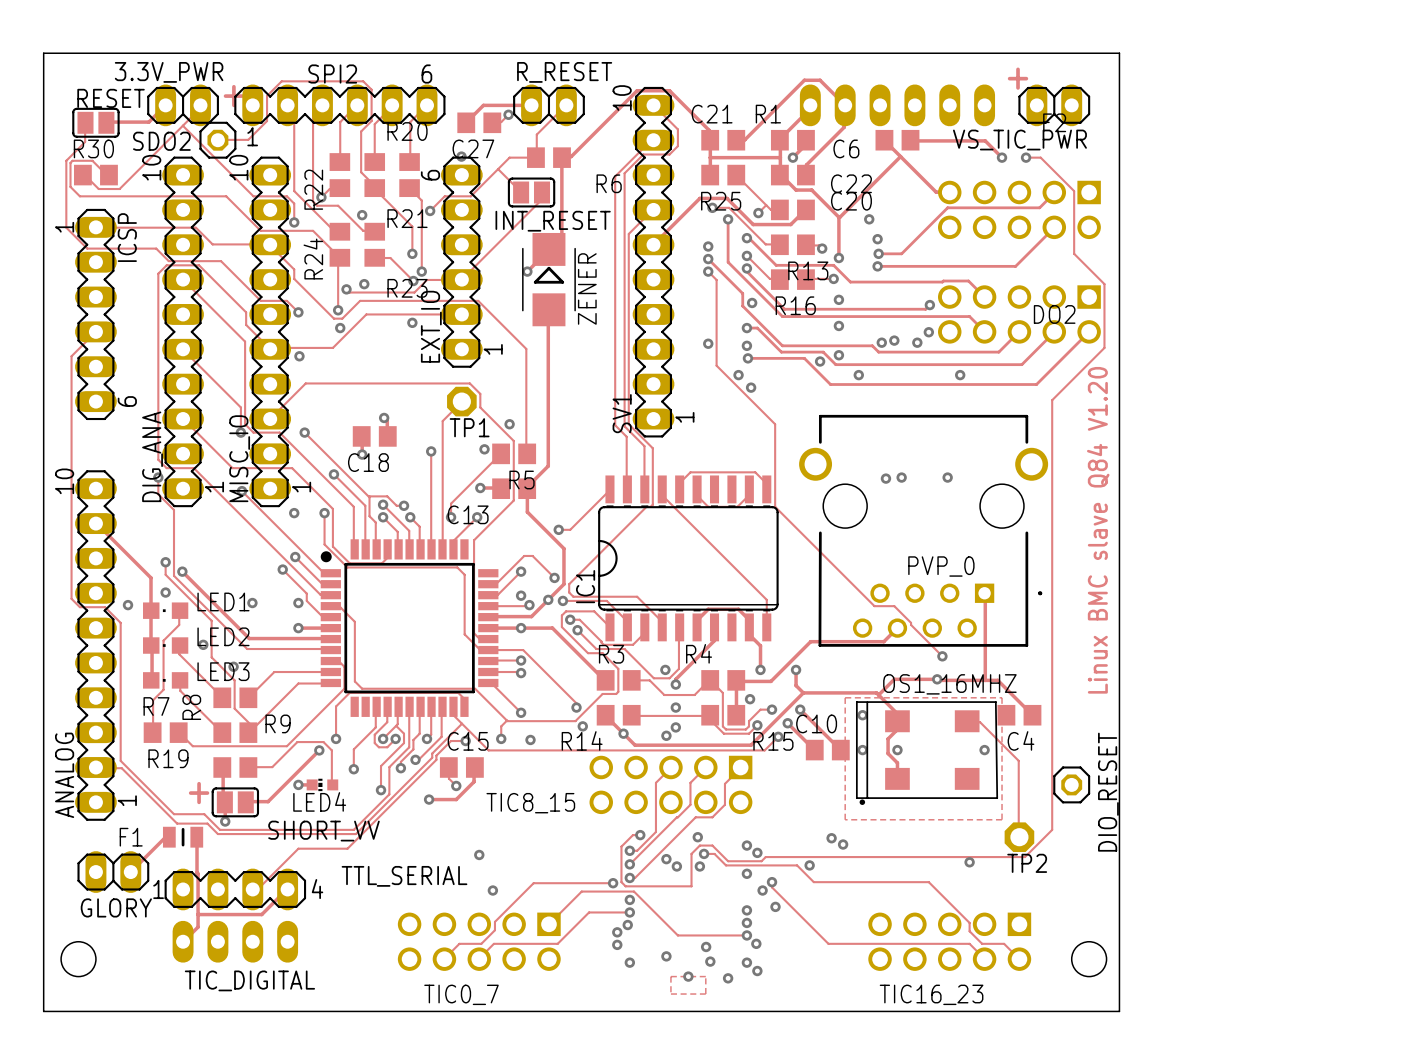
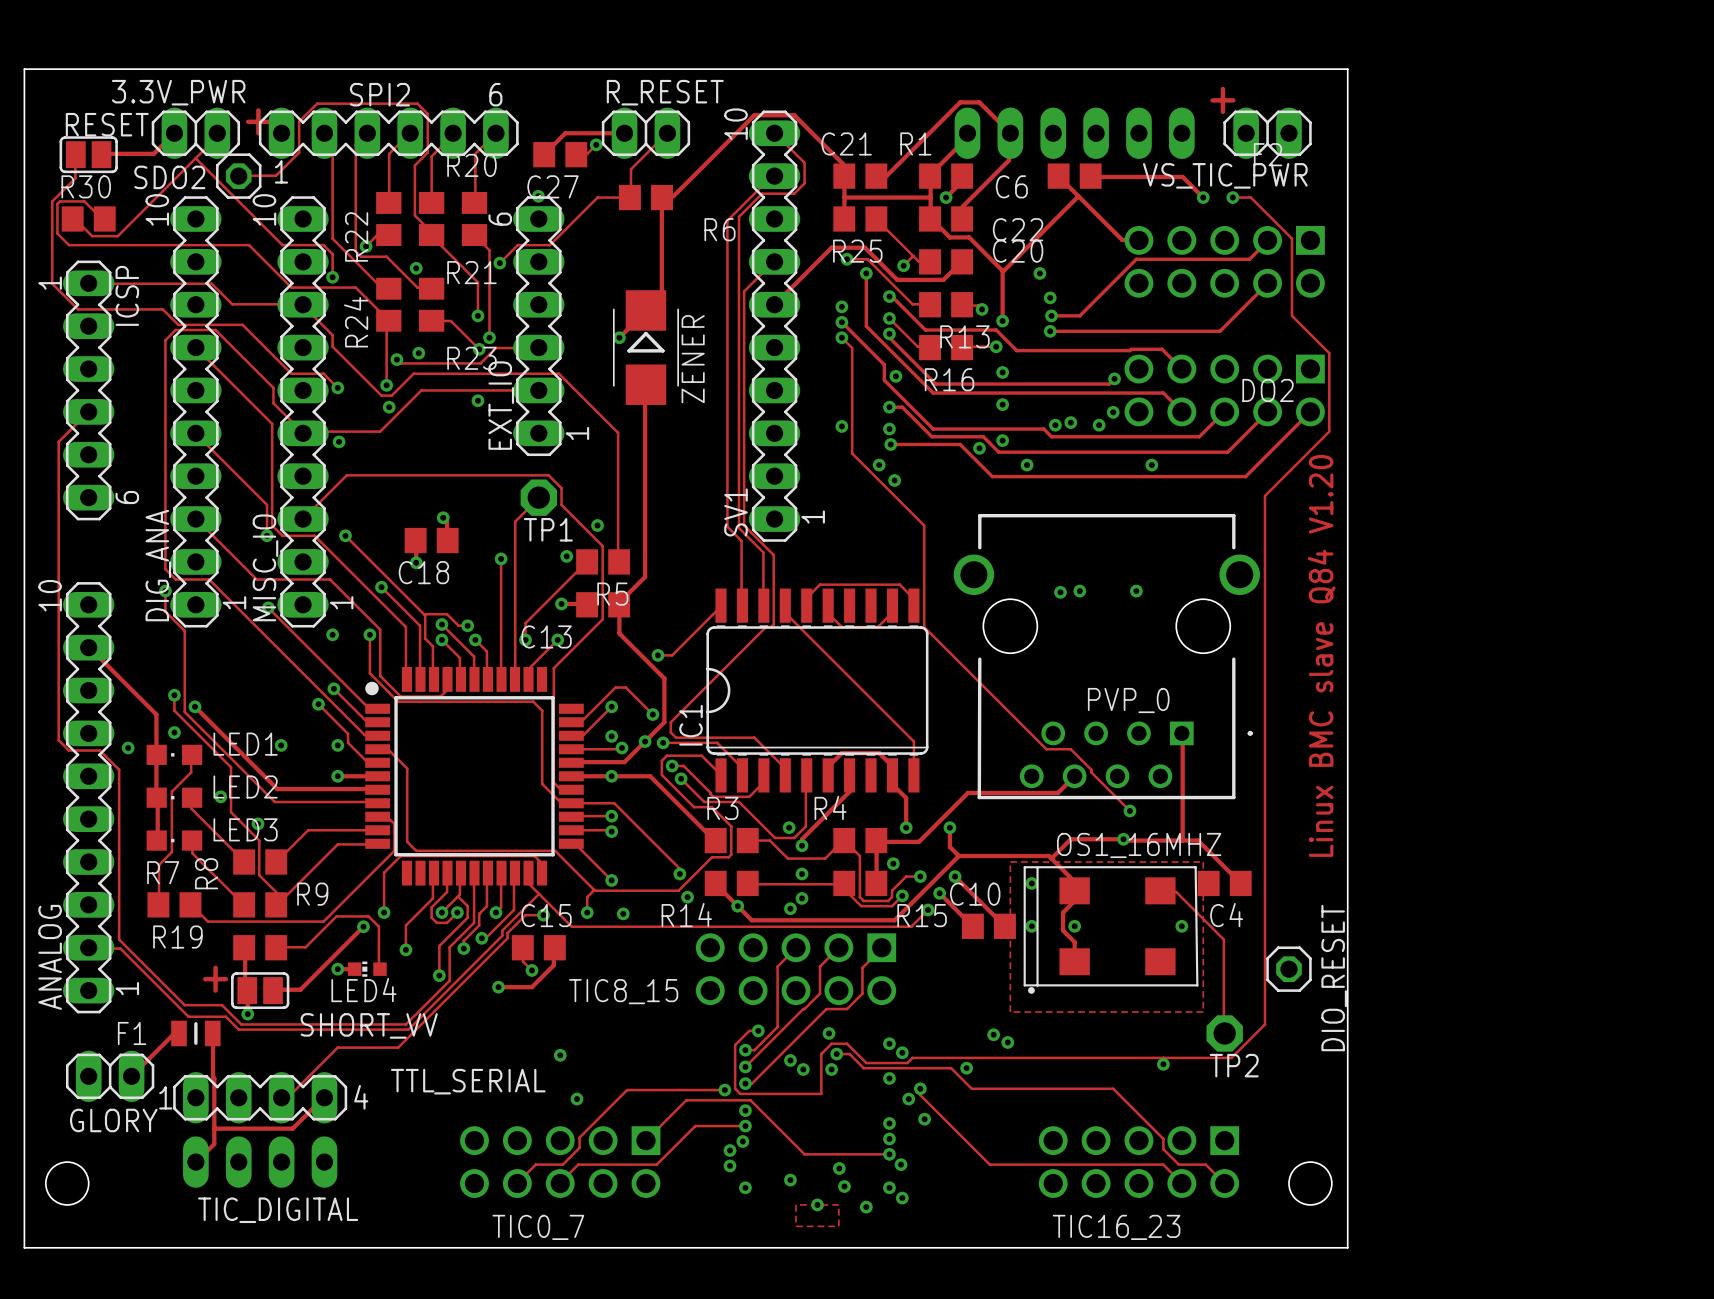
track: (498, 169) (521, 192) -> none
INT_RESET: (531, 192) -> none
track: (542, 192) (542, 199) (461, 279) -> none

